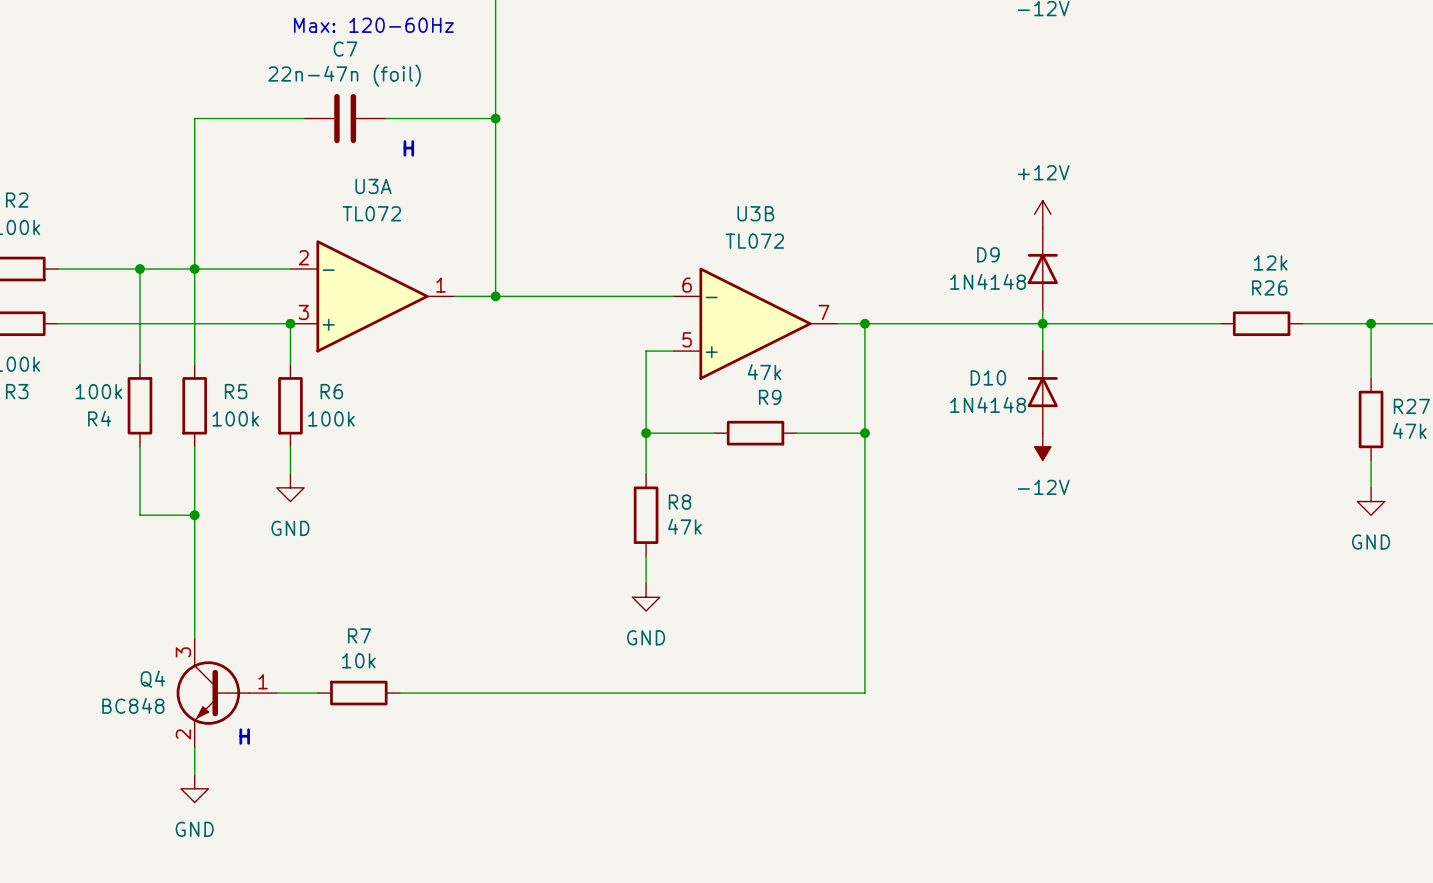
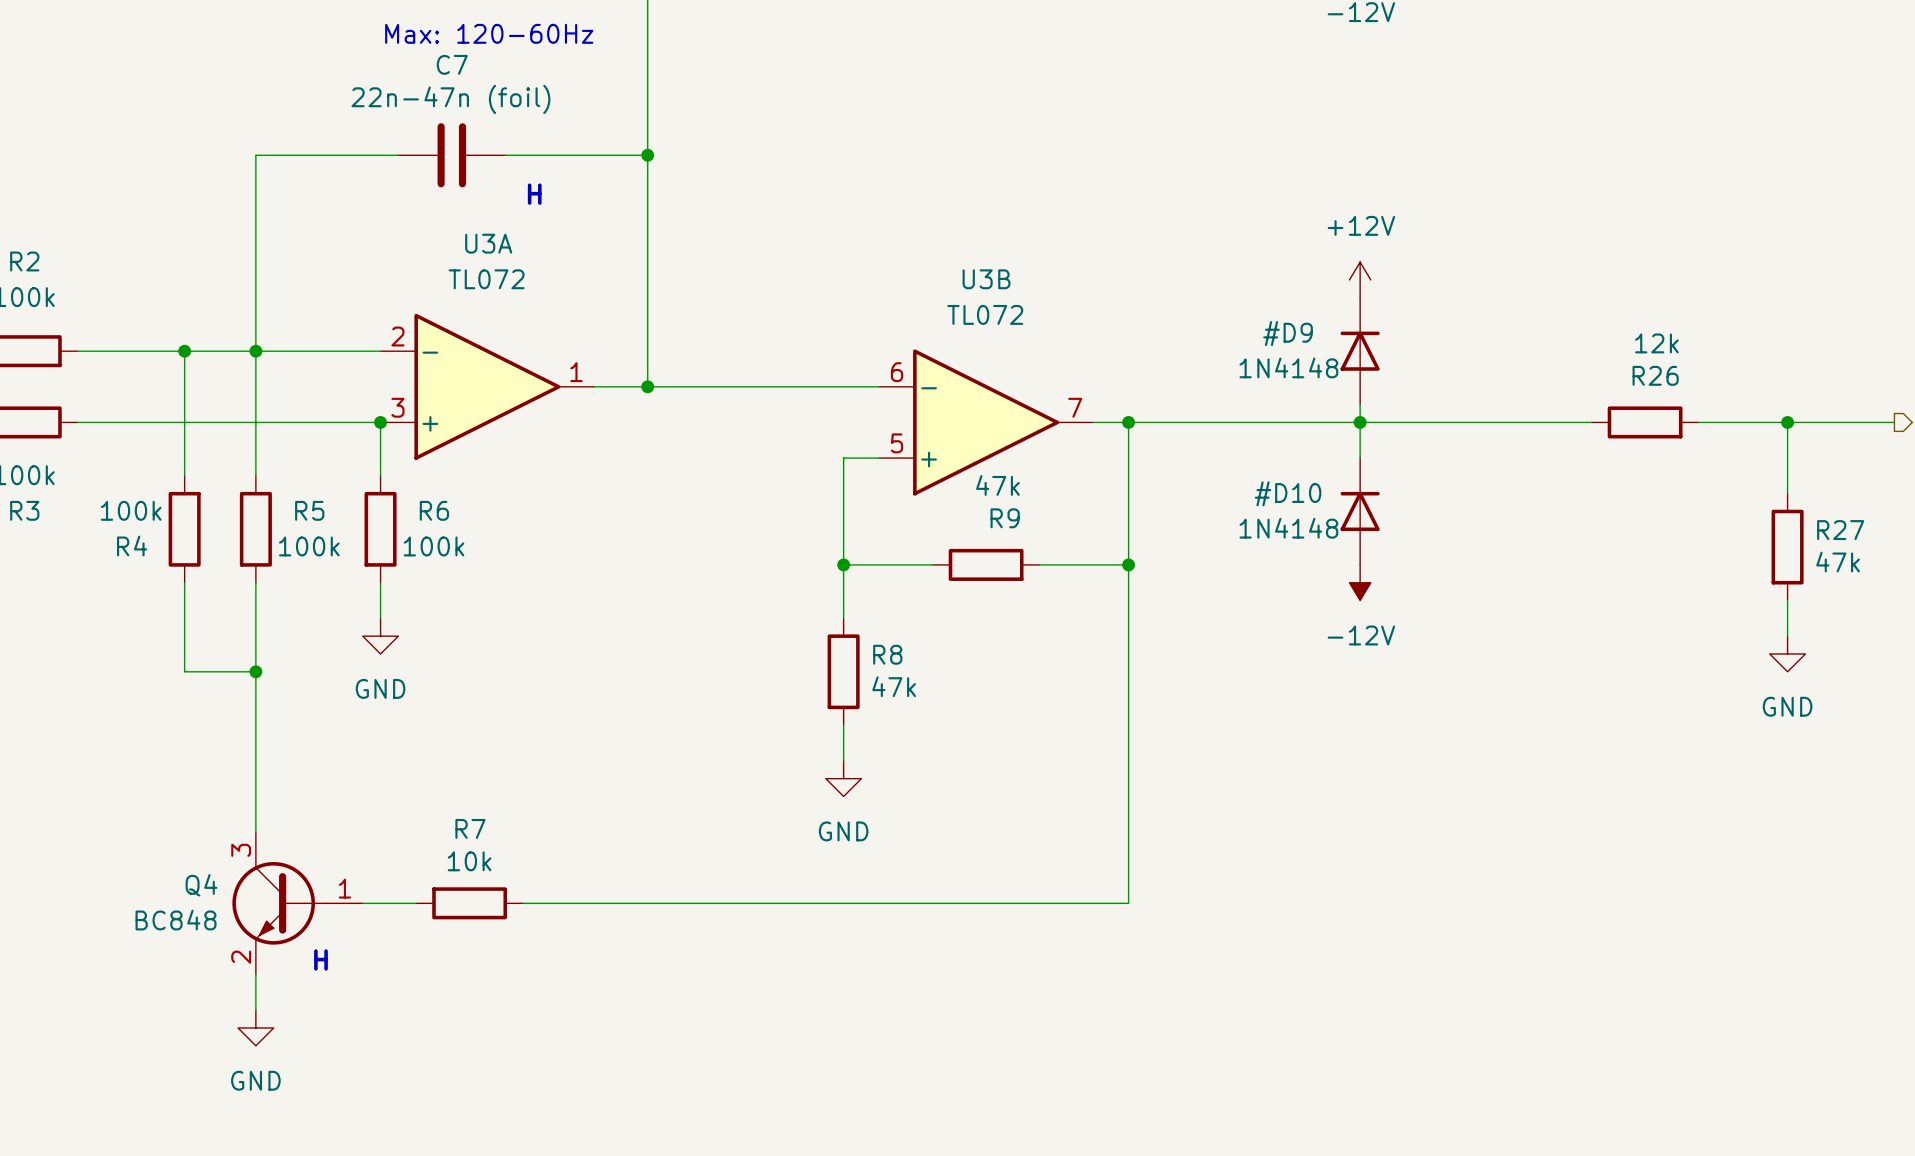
D9: 1N4148 (1042, 269) -> none
#D9: none -> 1N4148 (1360, 351)
D10: 1N4148 (1042, 392) -> none
#D10: none -> 1N4148 (1360, 511)

